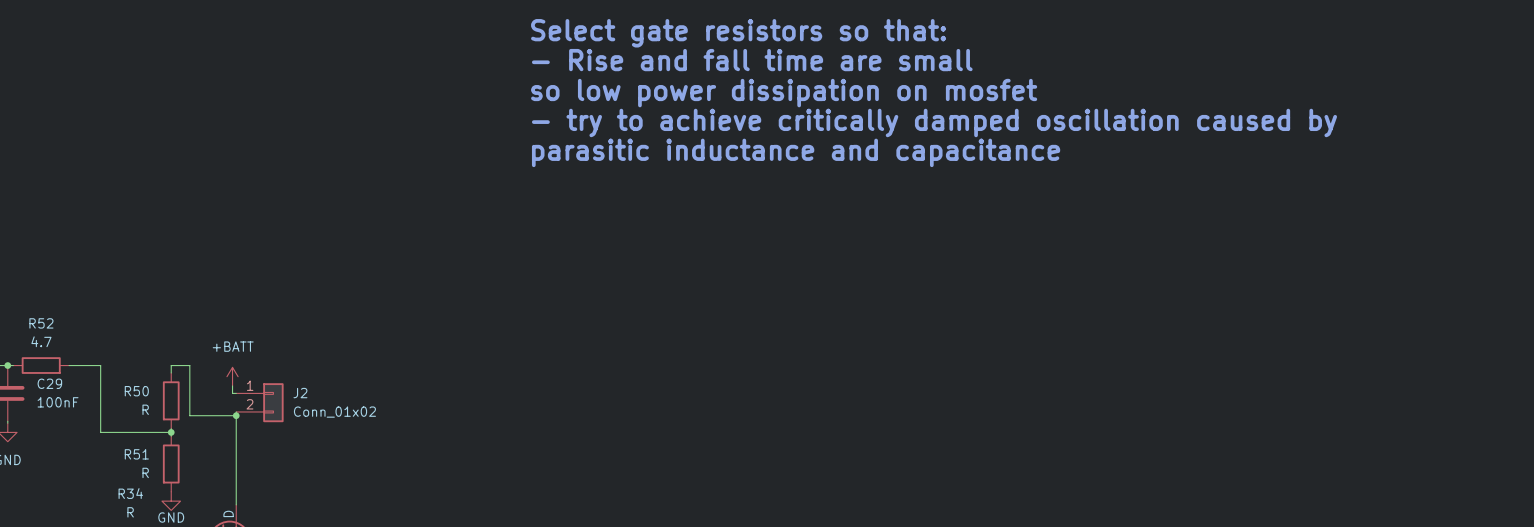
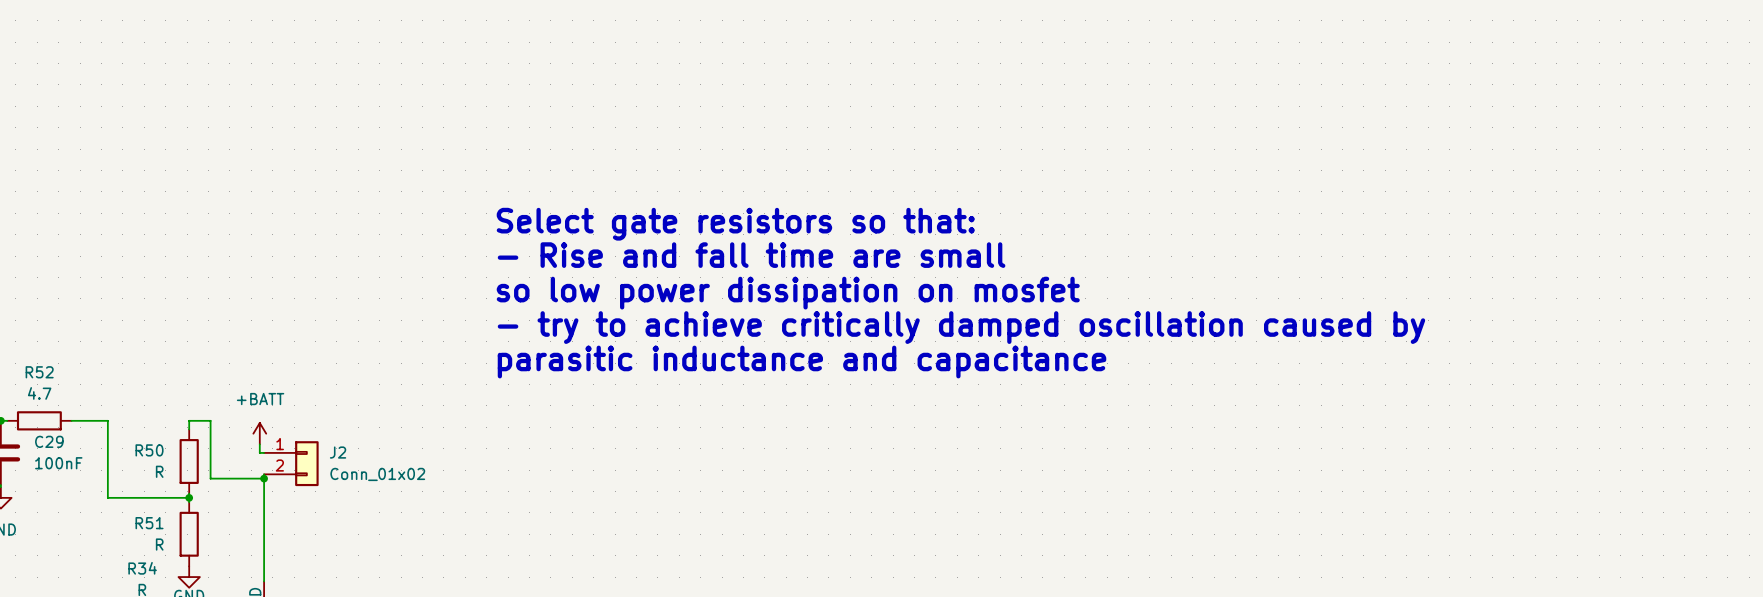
text: Select gate resistors so that: (738, 33) -> none
text: - Rise and fall time are small (752, 60) -> none
text: so low power dissipation on mosfet (784, 93) -> none
text: - try to achieve critically damped oscillation caused by (934, 122) -> none
text: parasitic inductance and capacitance (796, 152) -> none
text: none -> Select gate resistors so that: (735, 224)
text: none -> - Rise and fall time are small (751, 255)
text: none -> so low power dissipation on mosfet (788, 293)
text: none -> - try to achieve critically damped oscillation caused by (961, 327)
text: none -> parasitic inductance and capacitance (802, 362)

